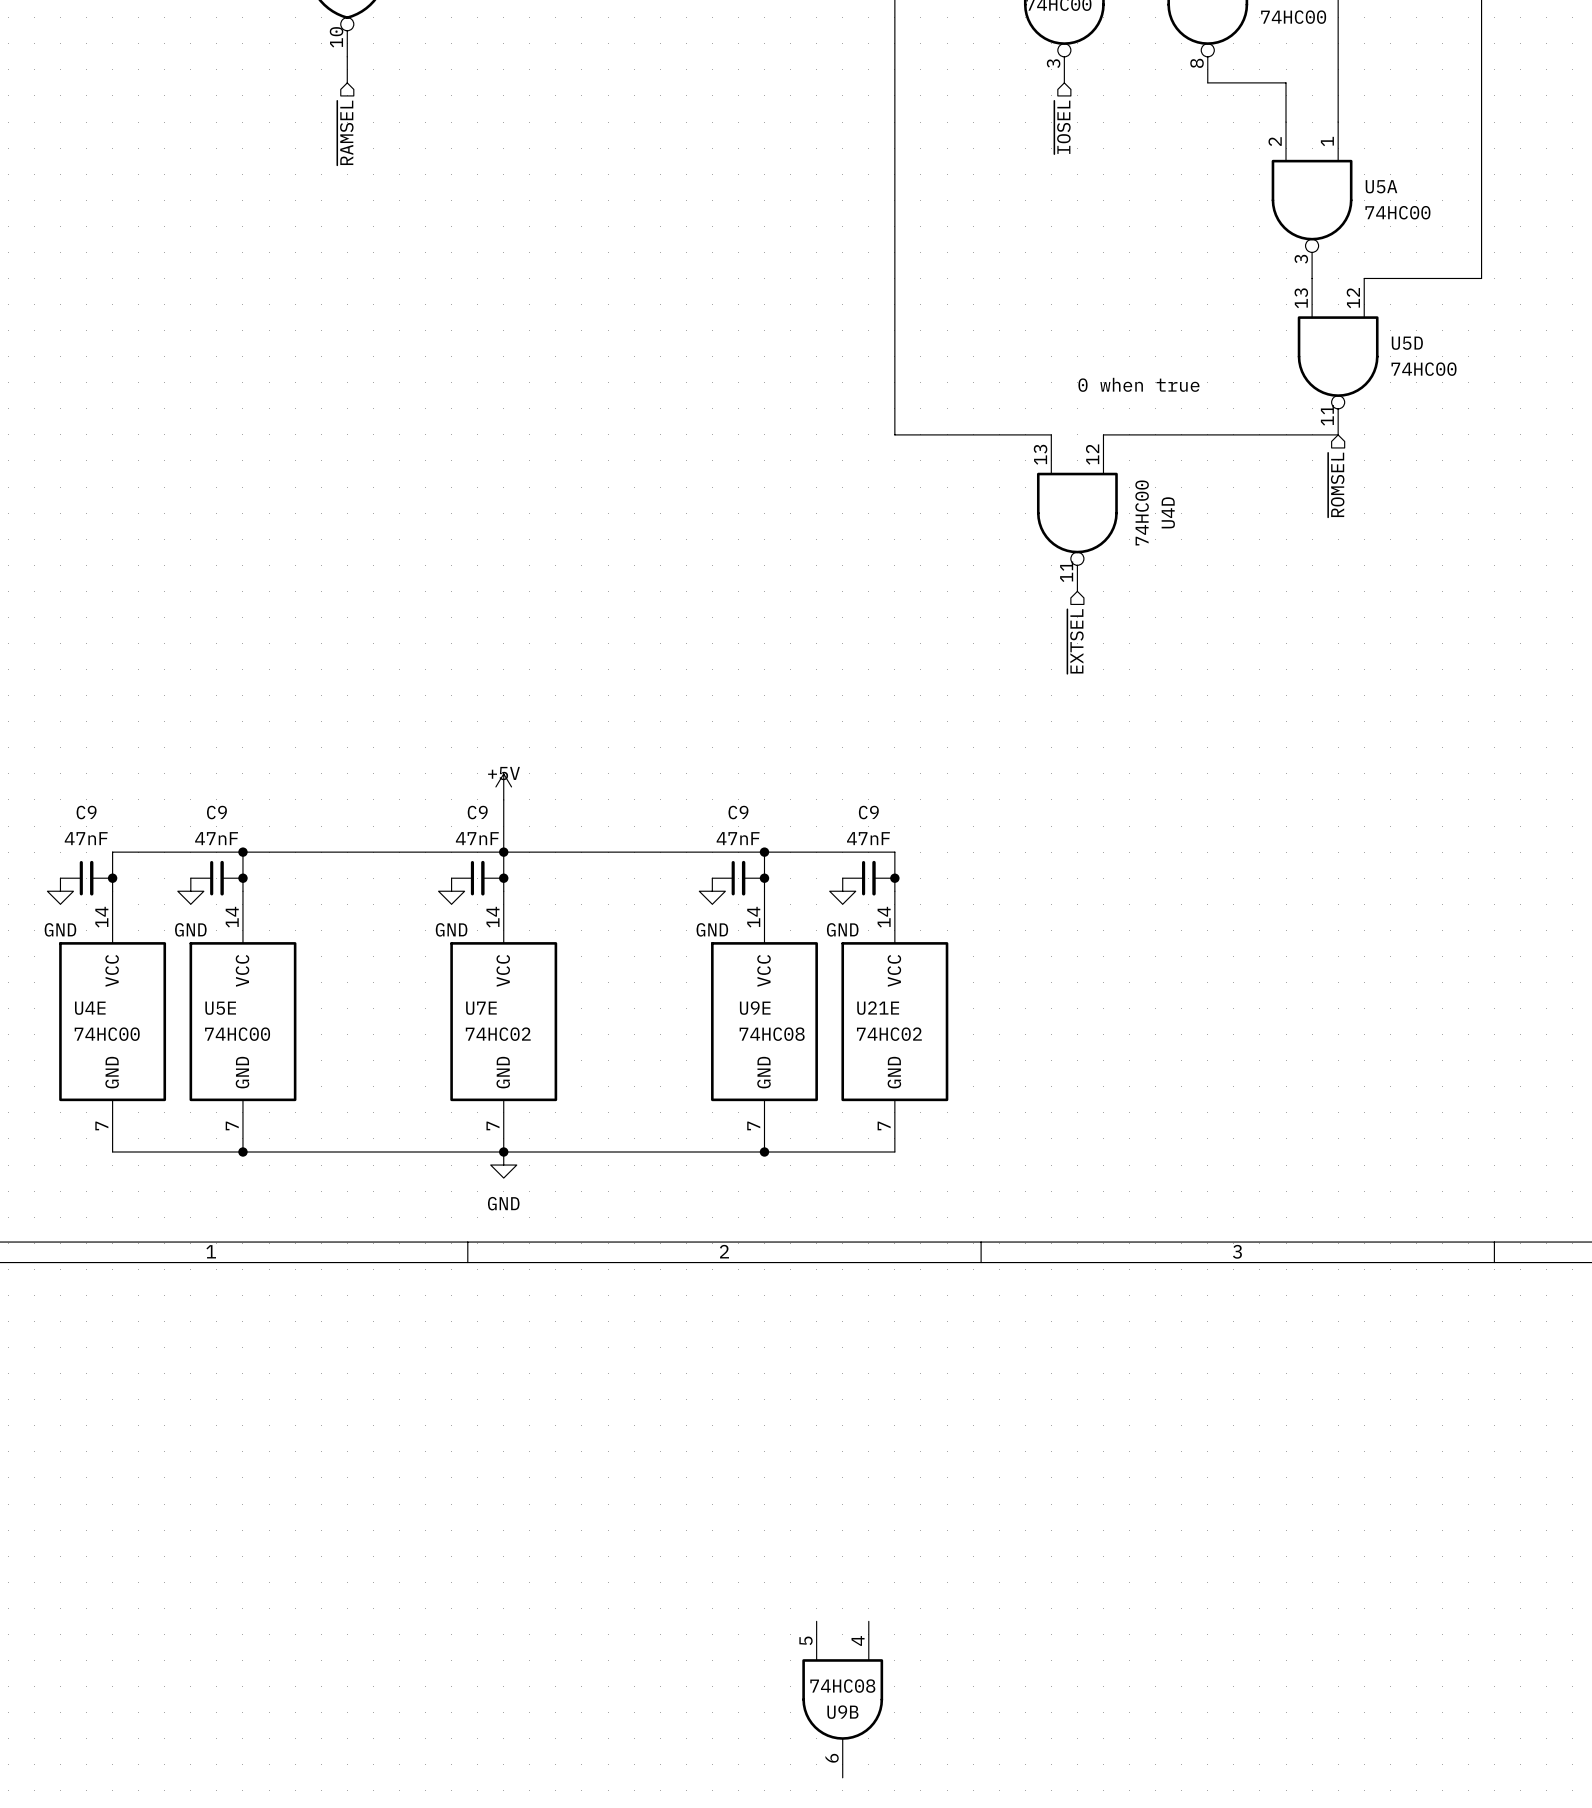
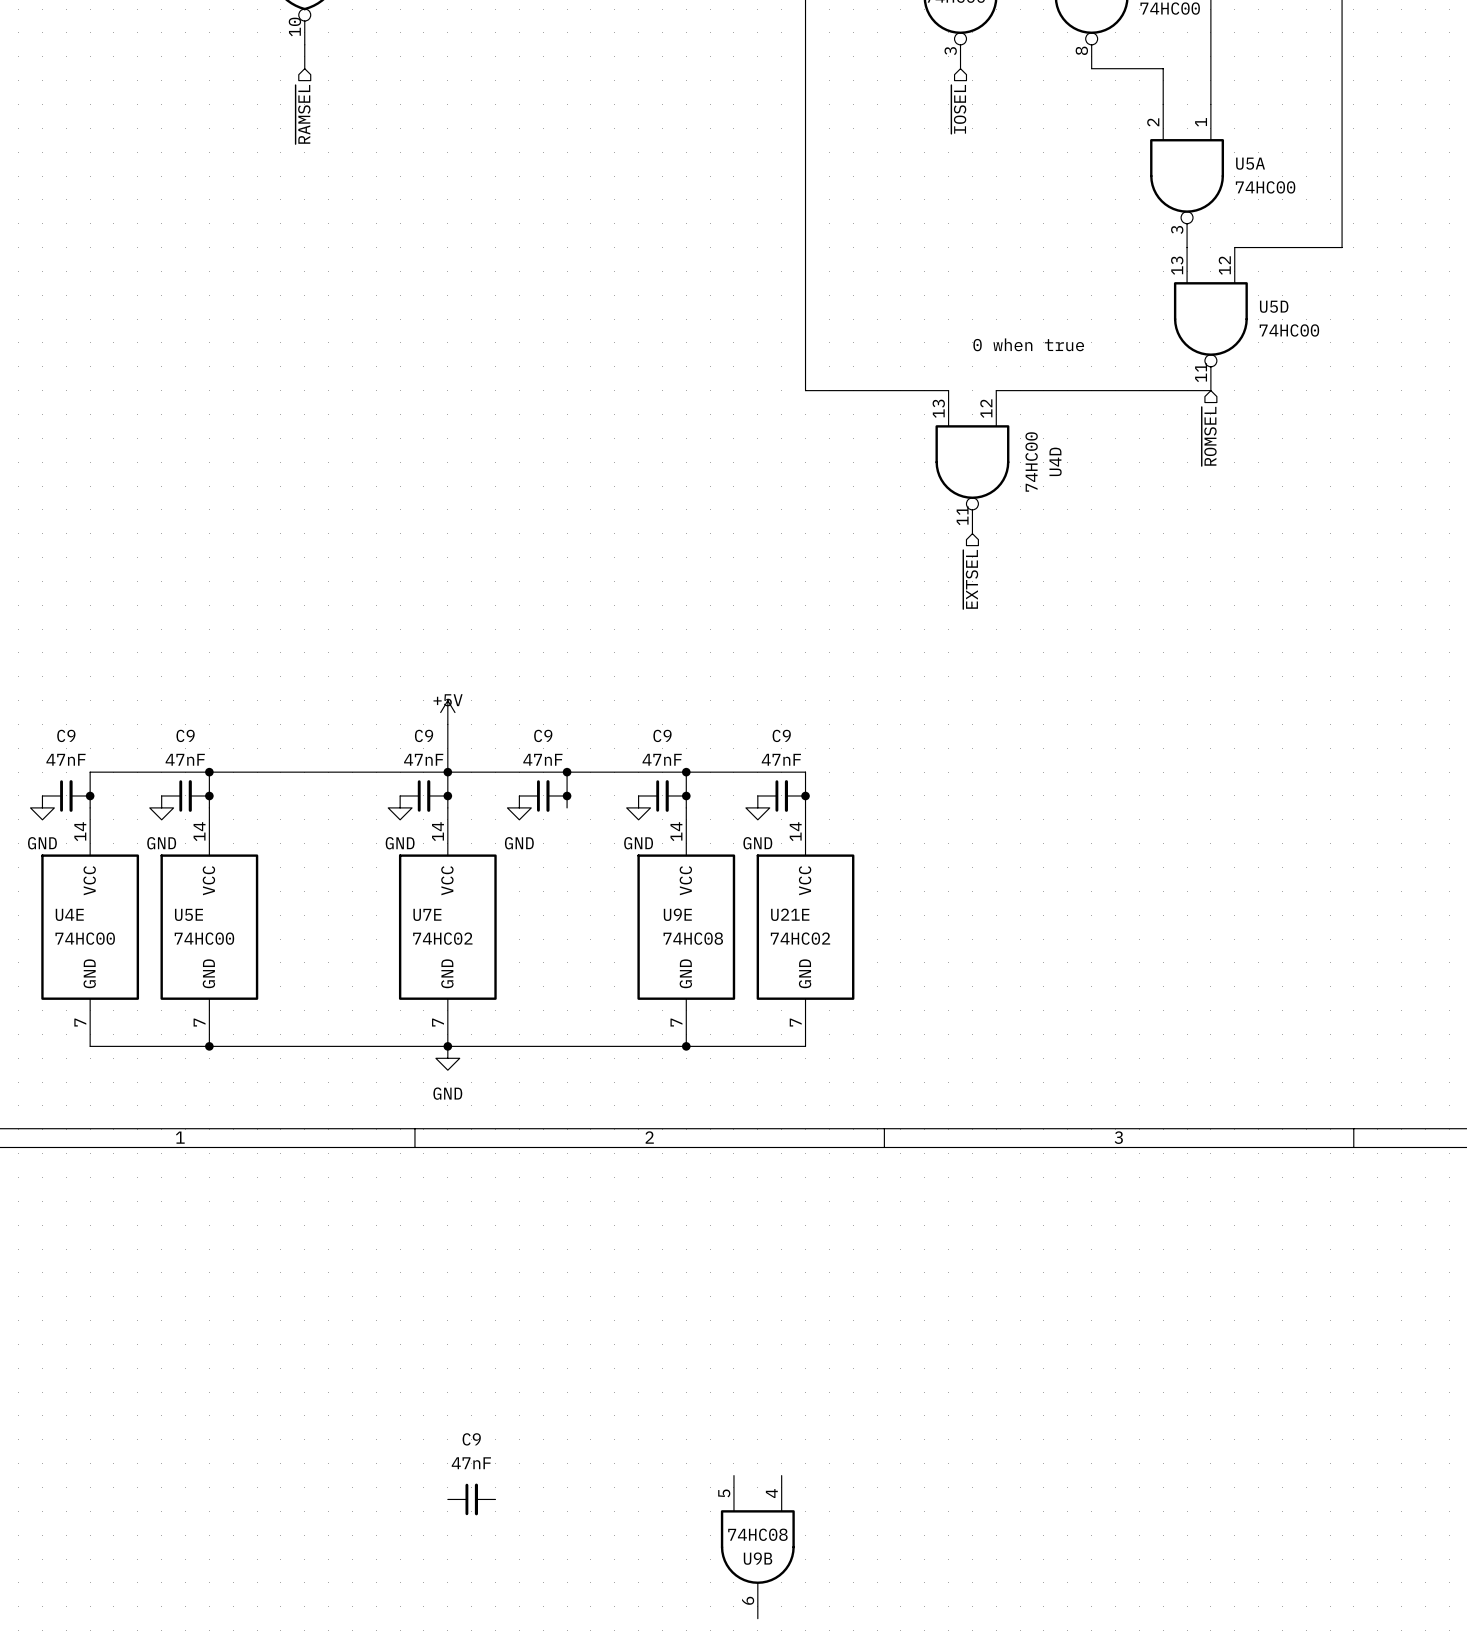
wire: none -> (567, 772) (567, 807)
junction: none -> (567, 772)
C9: none -> 47nF (543, 795)
junction: none -> (567, 795)
power symbol: none -> GND (519, 807)
C9: none -> 47nF (471, 1499)

